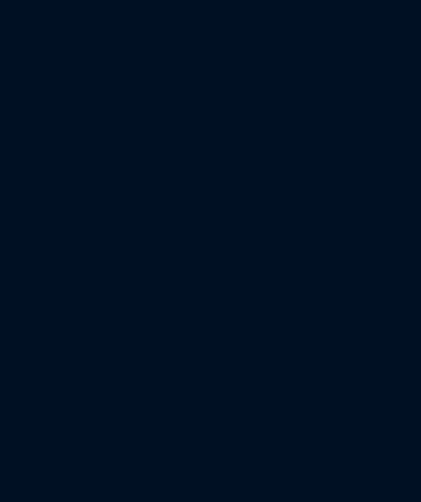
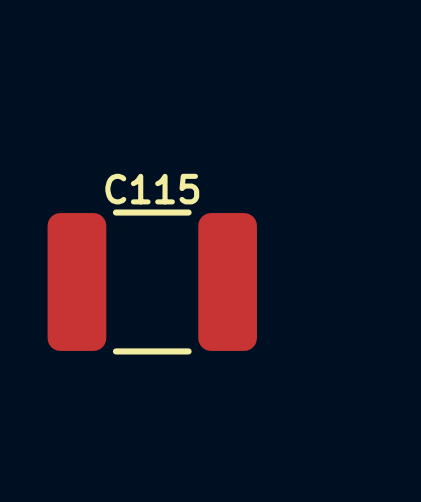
C115: none -> (152, 281)

